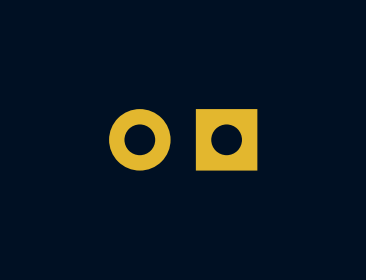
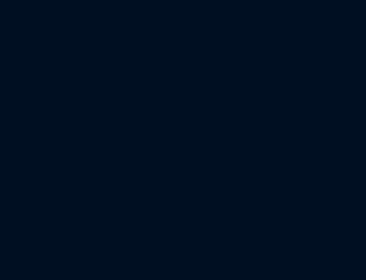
part: (183, 139) -> none

